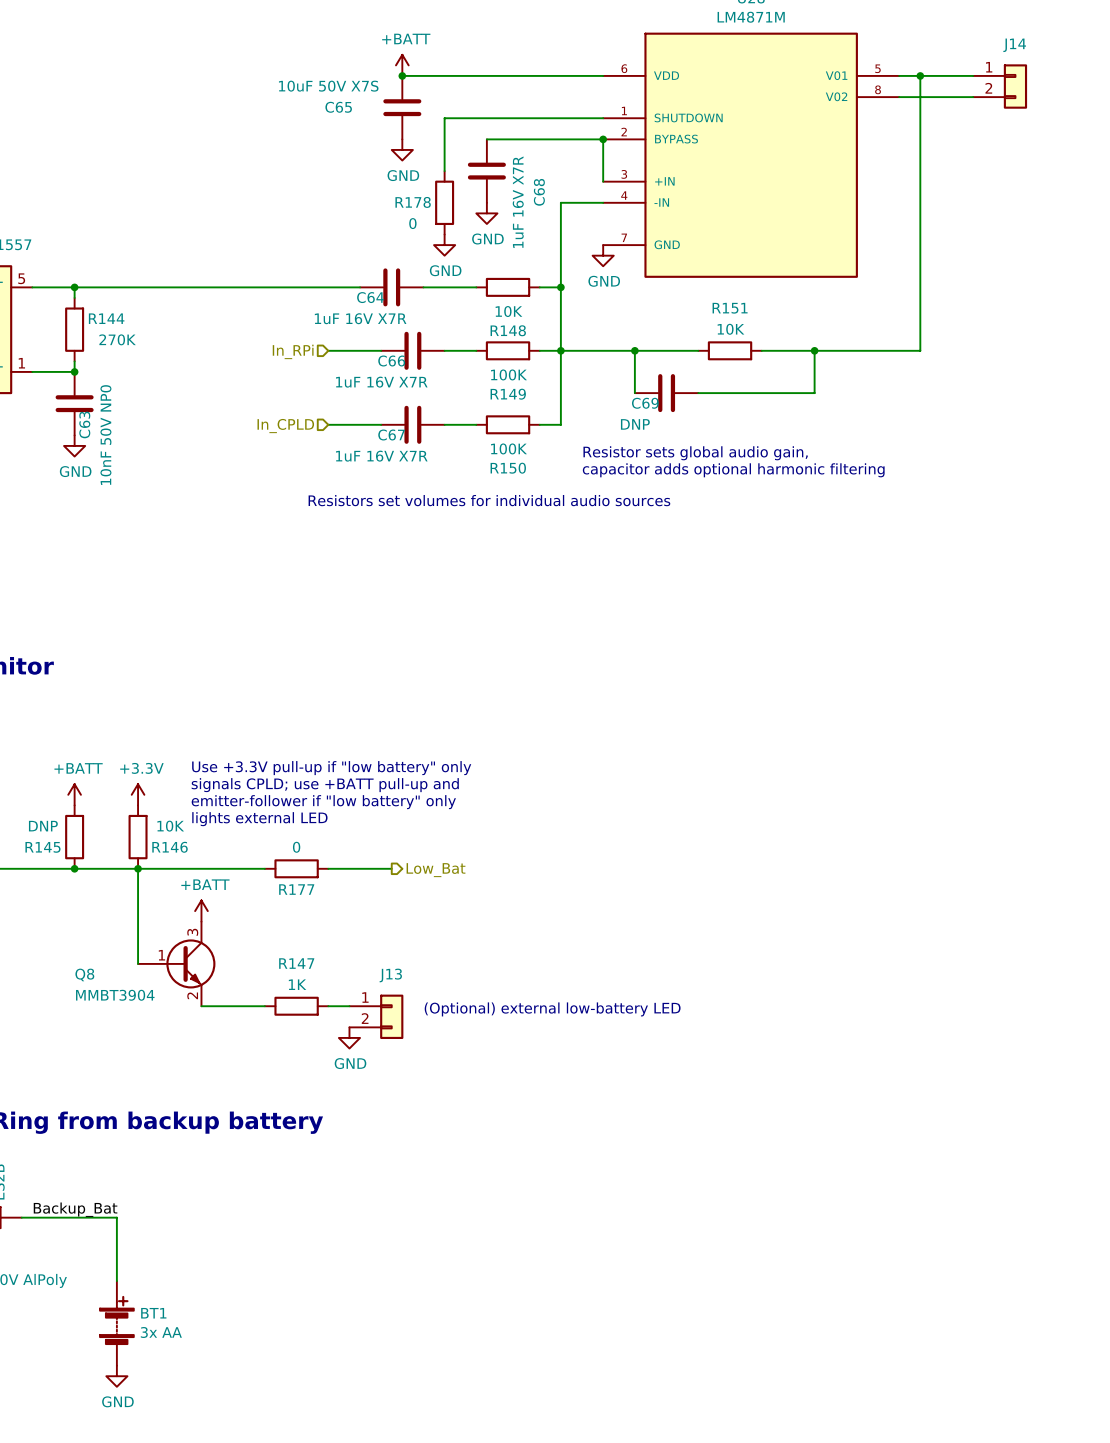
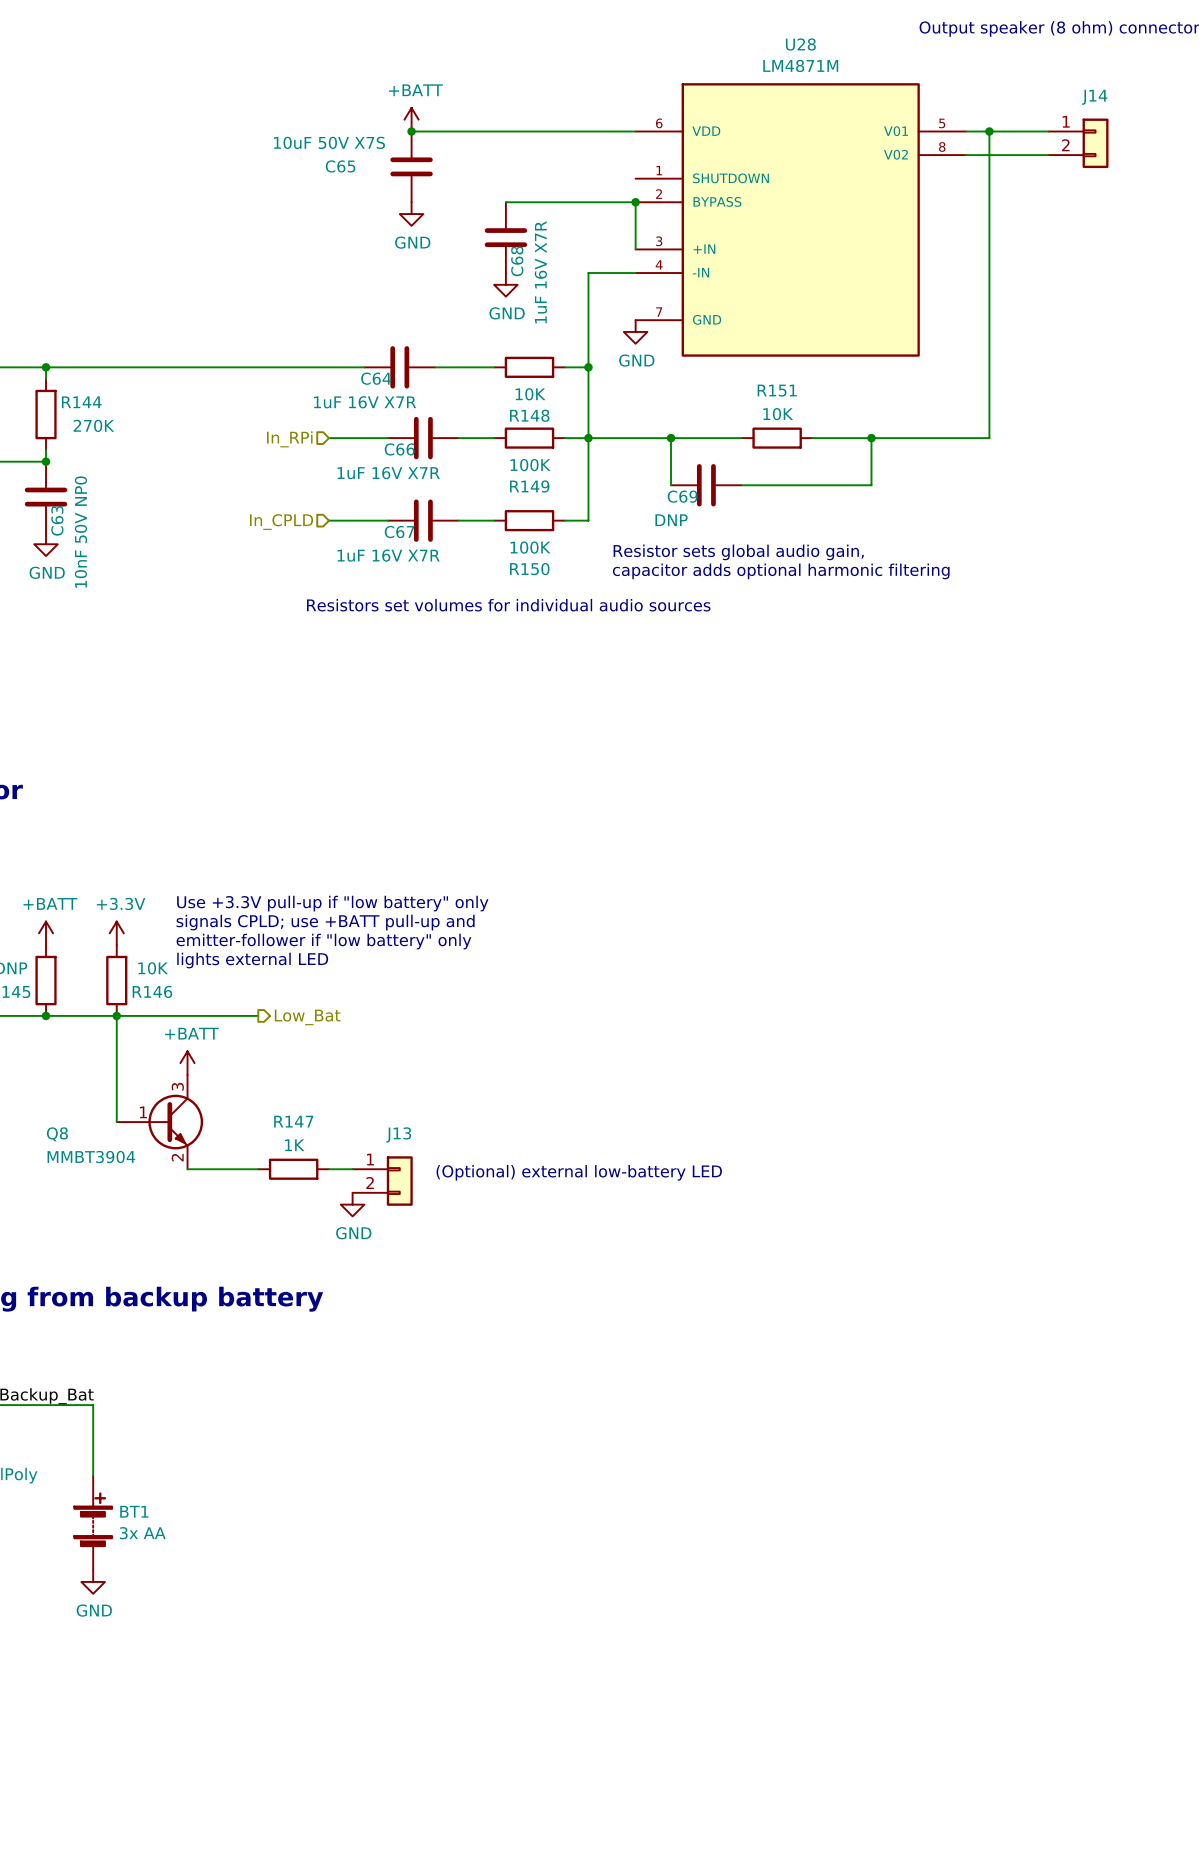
wire: (603, 118) (444, 118) (444, 171) -> none
C68 name position: C68 (539, 192) -> C68 (517, 261)
R178: 0 (444, 202) -> none
power symbol: GND (444, 245) -> none
R177: 0 (296, 868) -> none
wire: (328, 868) (391, 868) -> none
hierarchical label position: Low_Bat (436, 870) -> Low_Bat (307, 1017)

